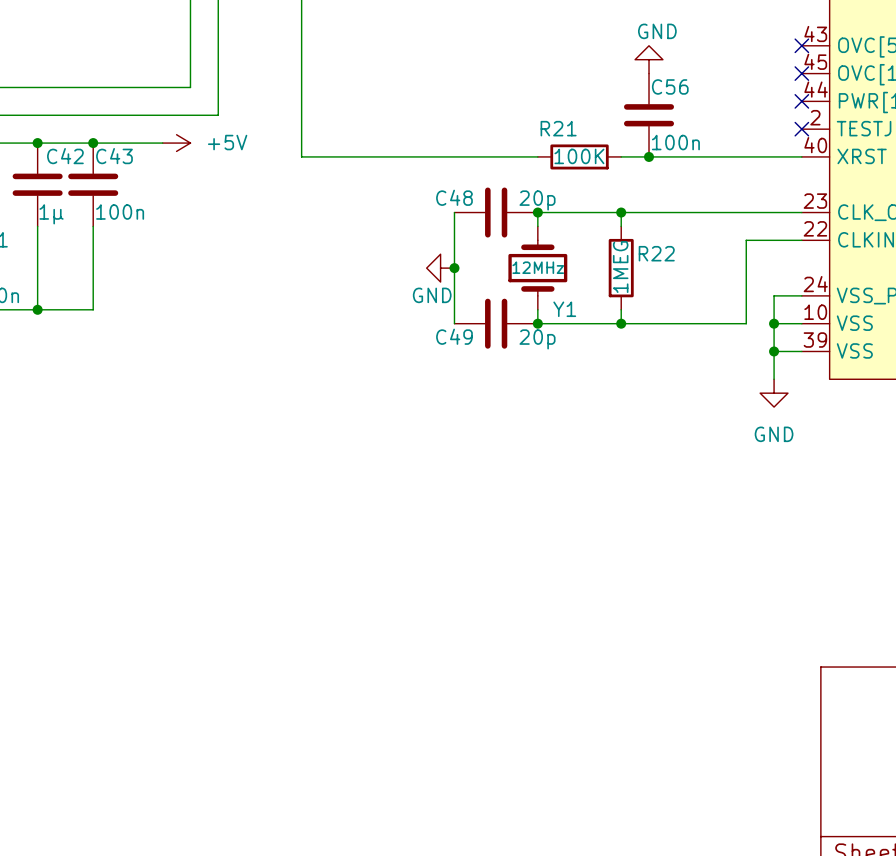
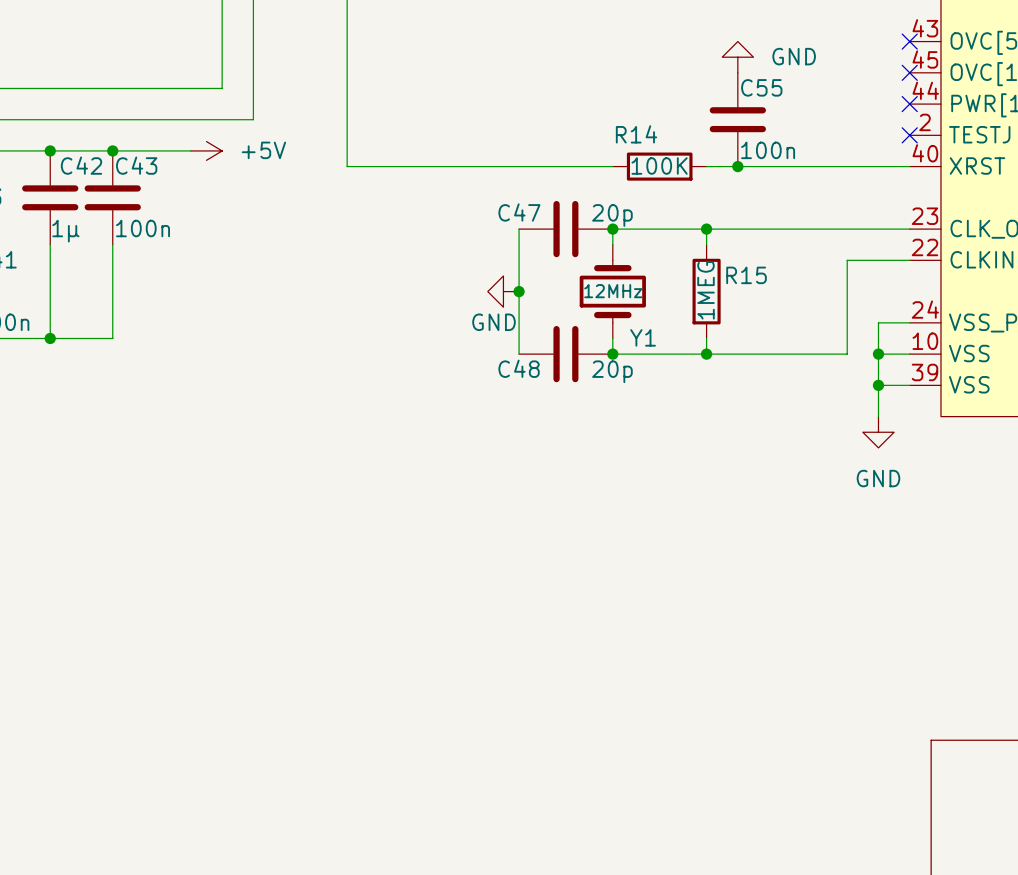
power symbol text position: GND (657, 31) -> GND (794, 56)
C56 name: C56 (670, 86) -> C55 (761, 87)
R21 name: R21 (558, 128) -> R14 (636, 134)
C48 name: C48 (454, 197) -> C47 (519, 212)
R22 name: R22 (656, 253) -> R15 (746, 275)
C49 name: C49 (454, 336) -> C48 (519, 368)

